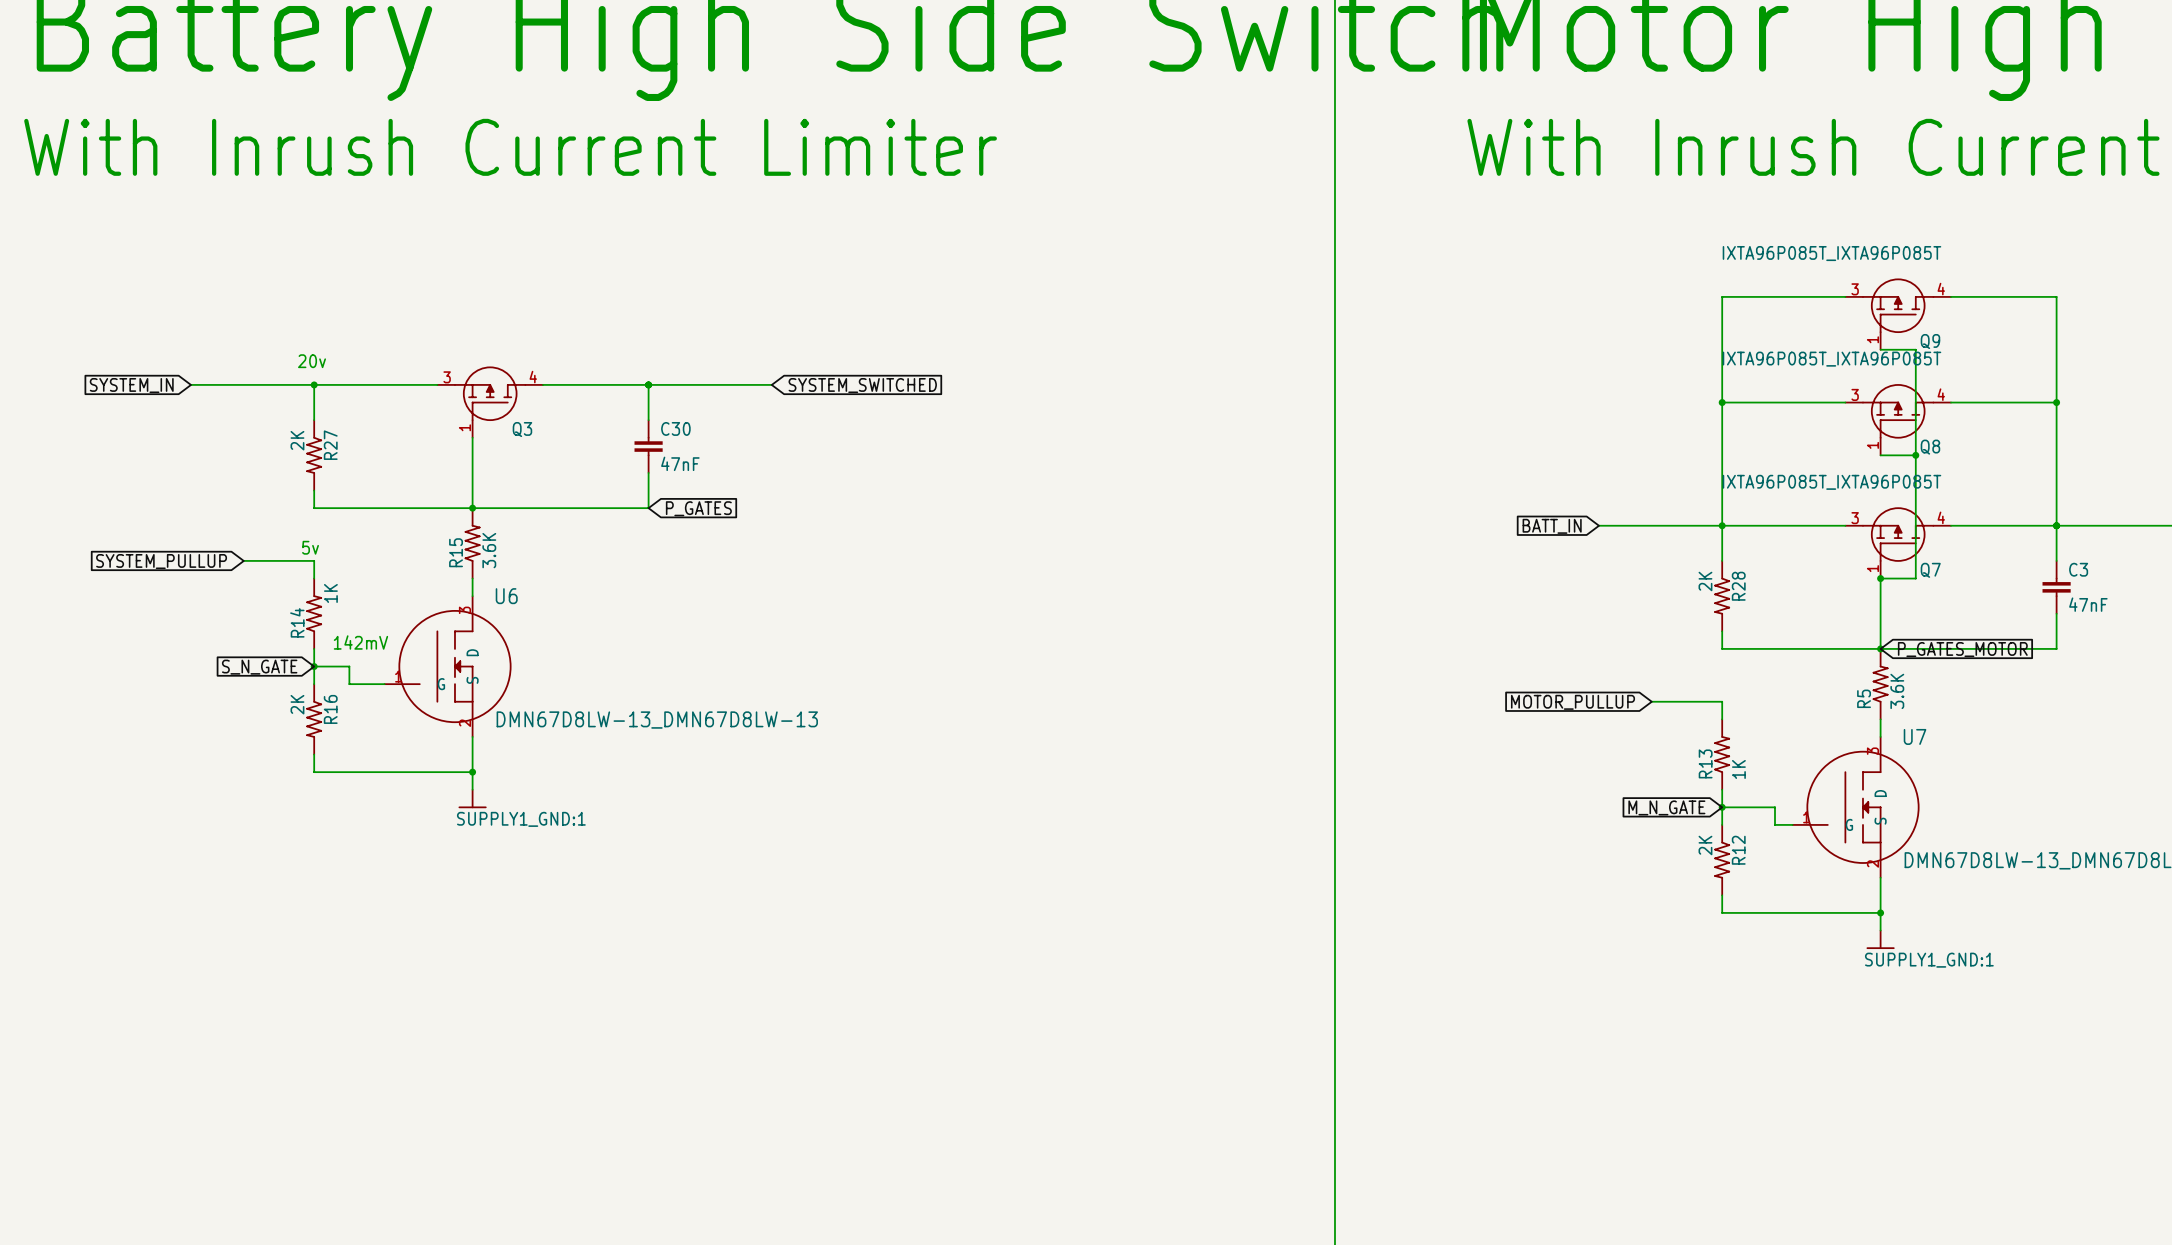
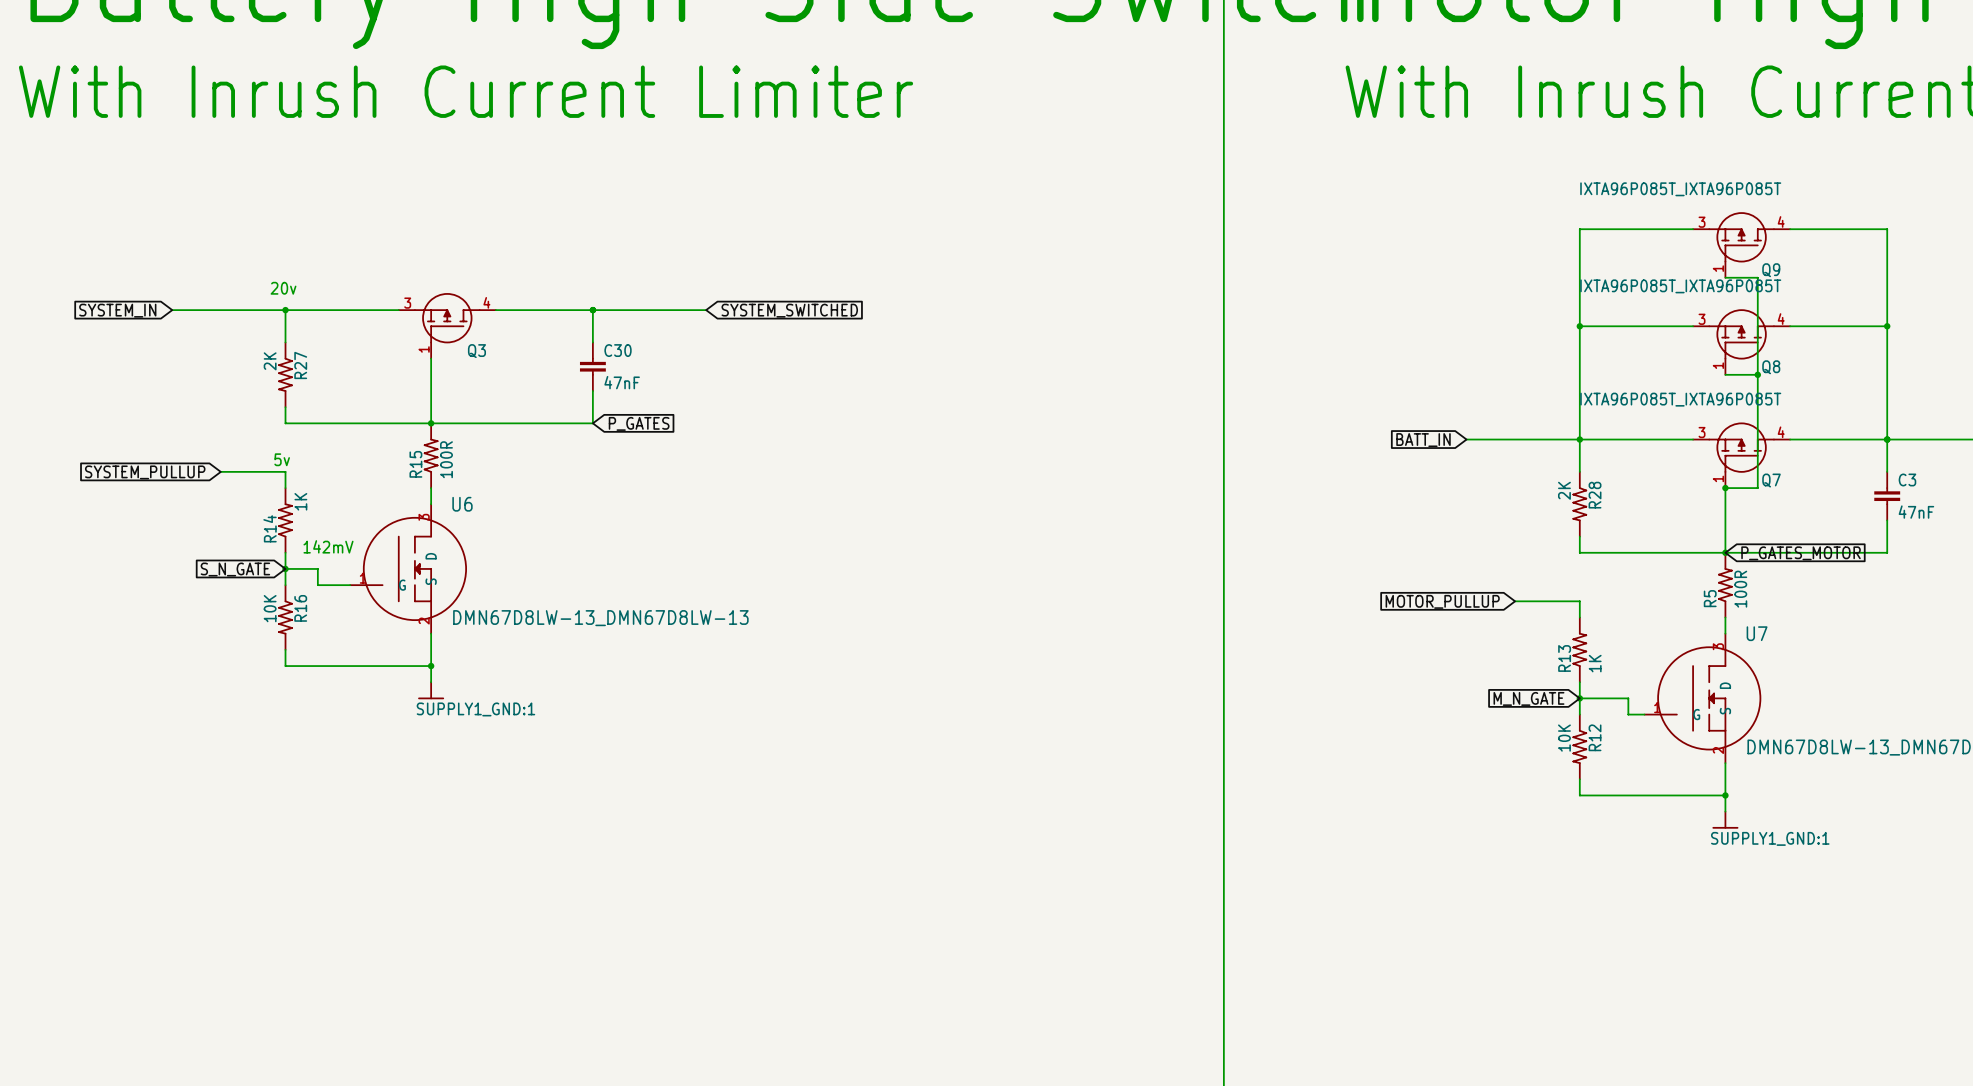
R15 value: 3.6K (489, 550) -> 100R (446, 459)
R5 value: 3.6K (1897, 691) -> 100R (1740, 589)
R16 value: 2K (297, 704) -> 10K (270, 608)
R12 value: 2K (1705, 845) -> 10K (1564, 738)

